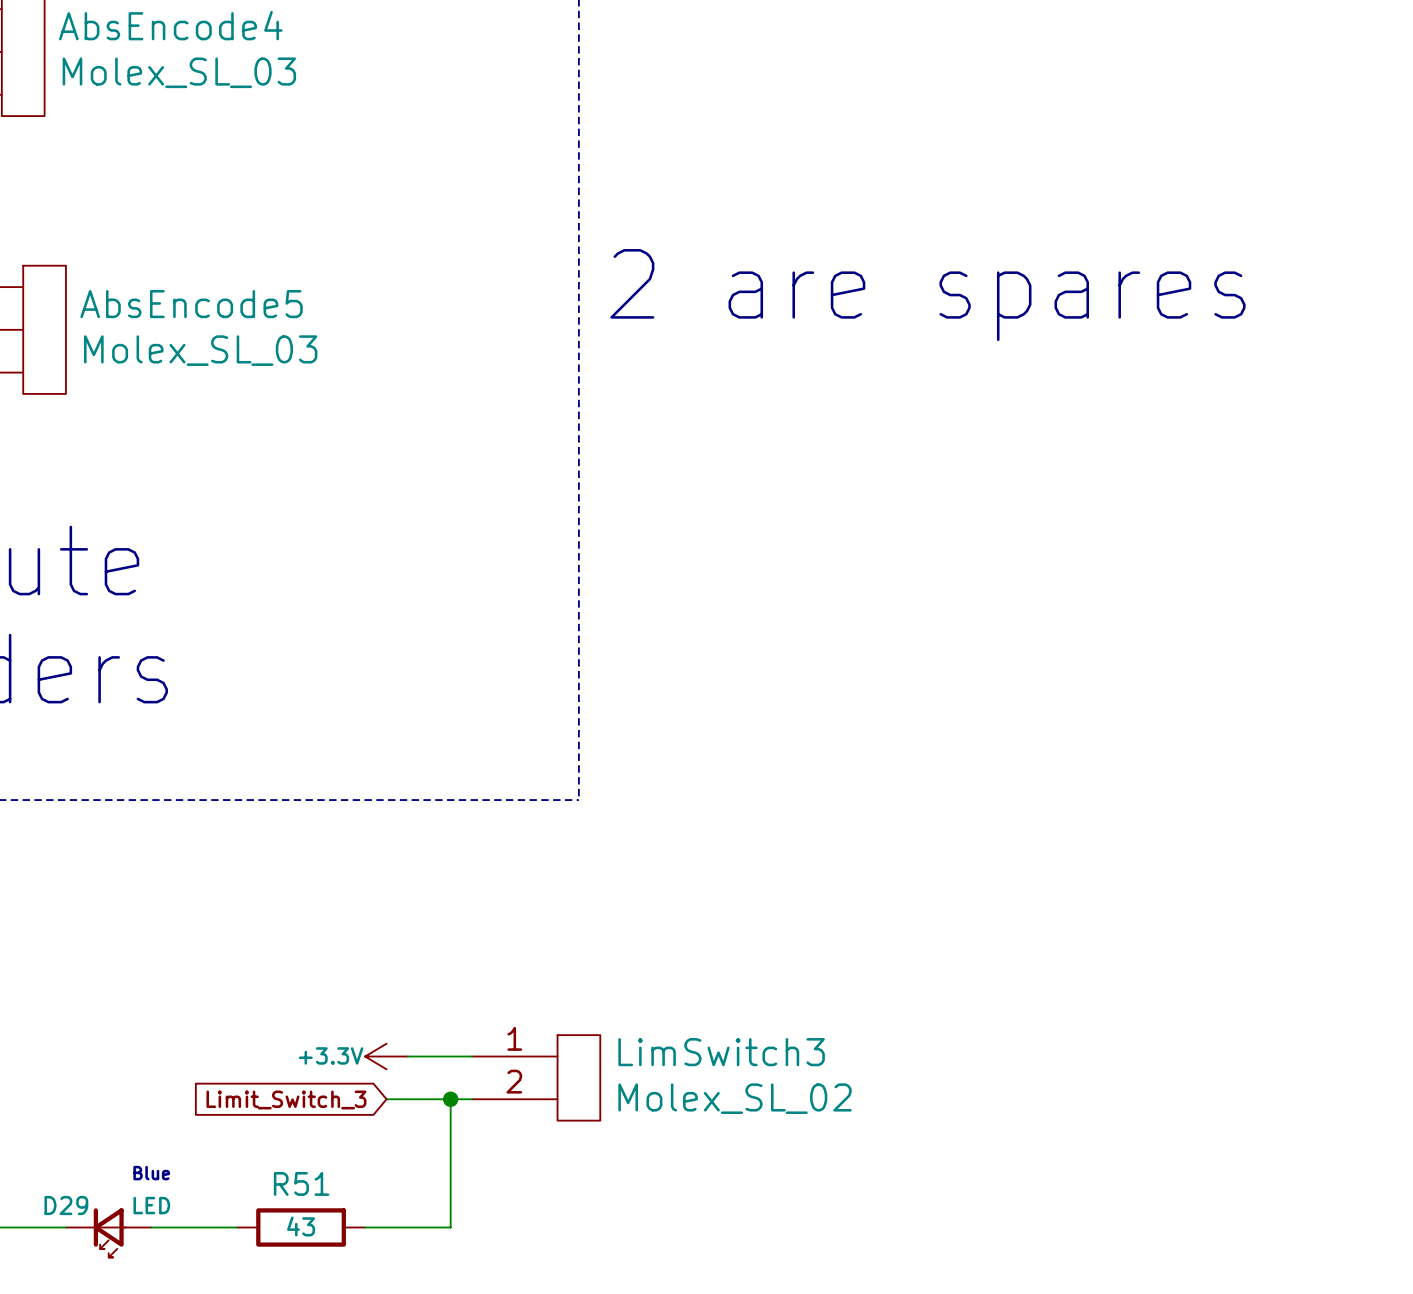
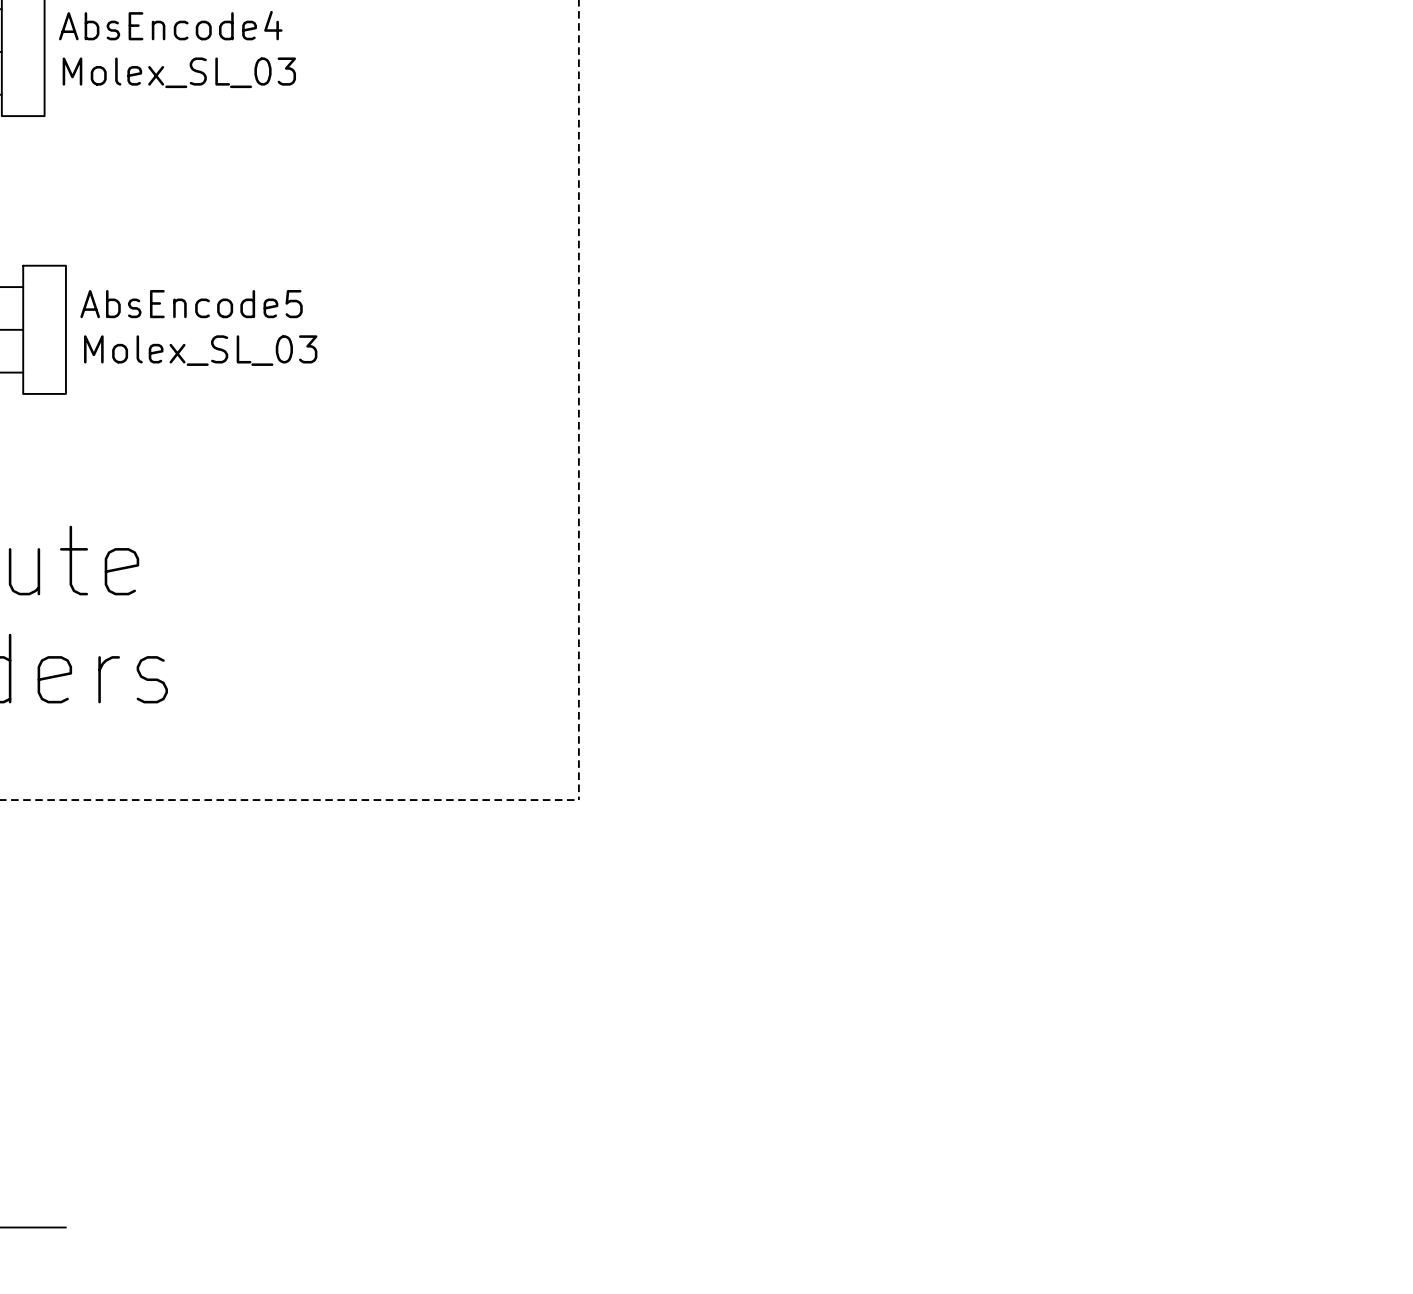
text: 2 are spares (927, 295) -> none
power symbol: +3.3V (386, 1056) -> none
wire: (407, 1056) (472, 1056) -> none
LimSwitch3: Molex_SL_02 (536, 1077) -> none
global label: Limit_Switch_3 (286, 1099) -> none
wire: (386, 1099) (472, 1099) -> none
wire: (450, 1099) (450, 1227) (365, 1227) -> none
junction: (450, 1099) -> none
text: Blue (151, 1173) -> none
wire: (151, 1227) (236, 1227) -> none
R51: 43 (301, 1227) -> none
D29: LED (108, 1232) -> none

